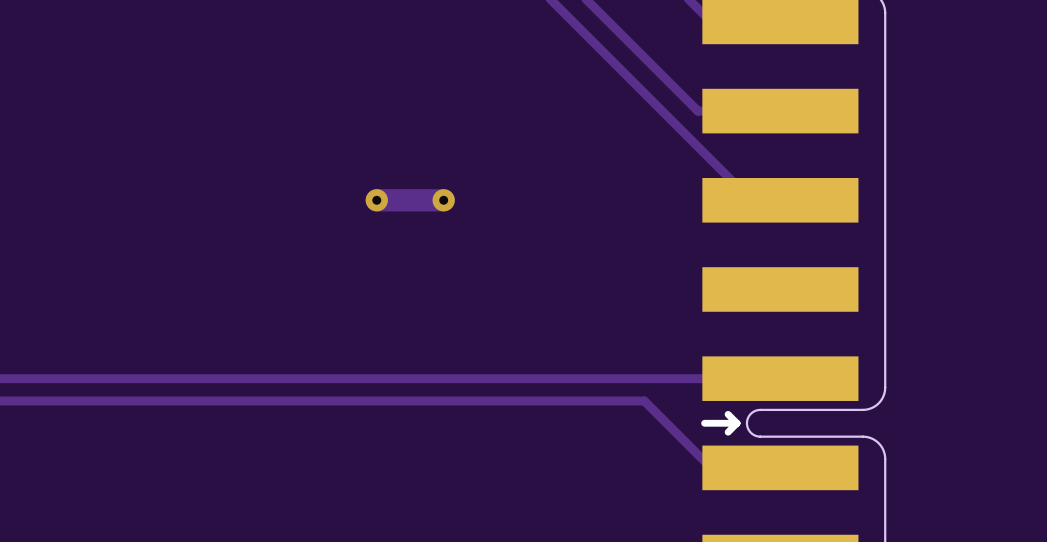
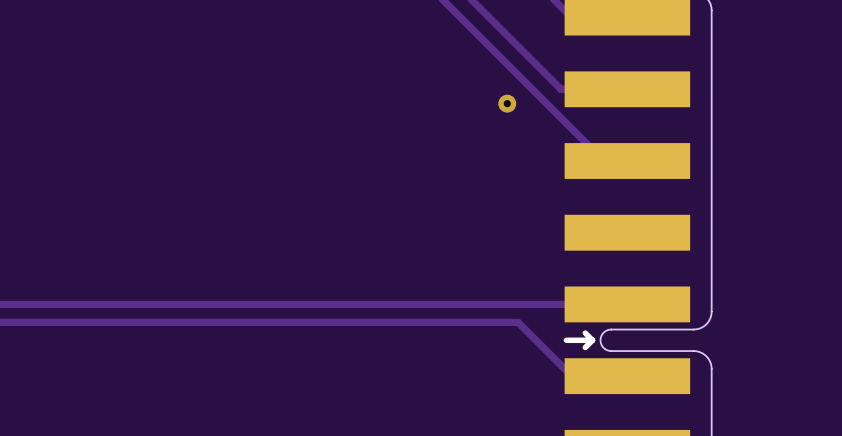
via: none -> (507, 103)
track: (376, 200) (443, 200) -> none
via: (376, 200) -> none
via: (443, 200) -> none

